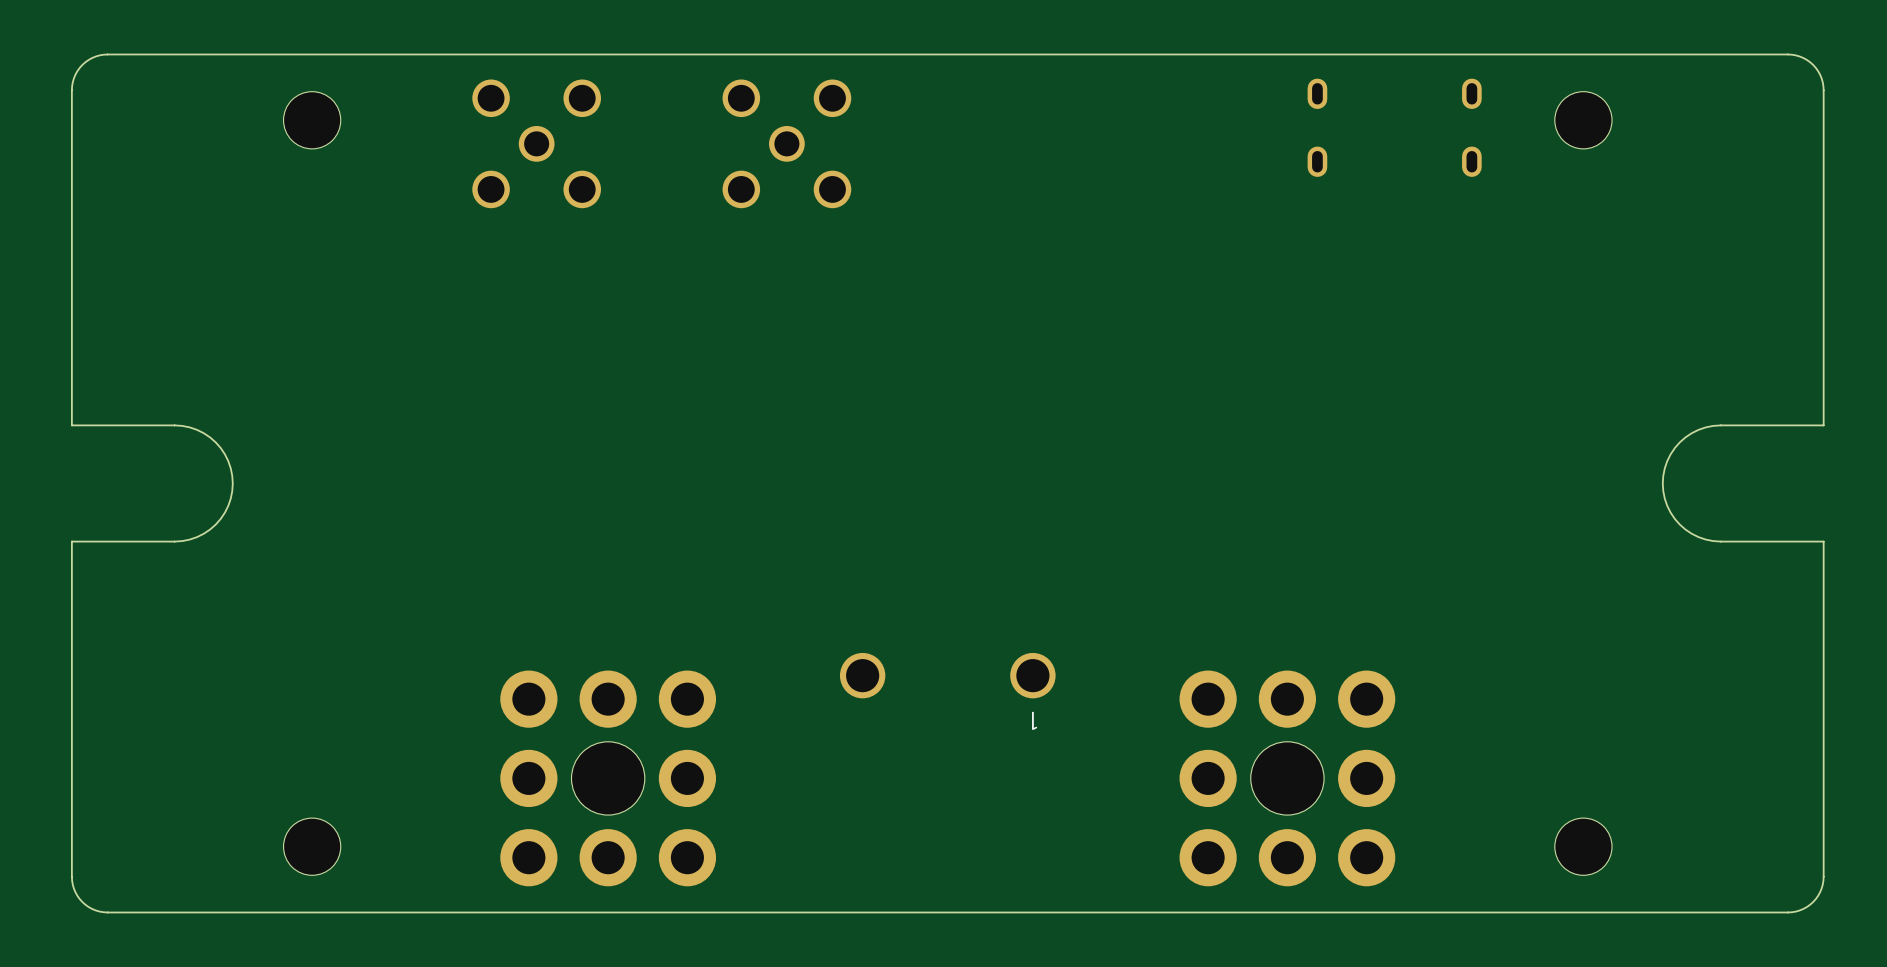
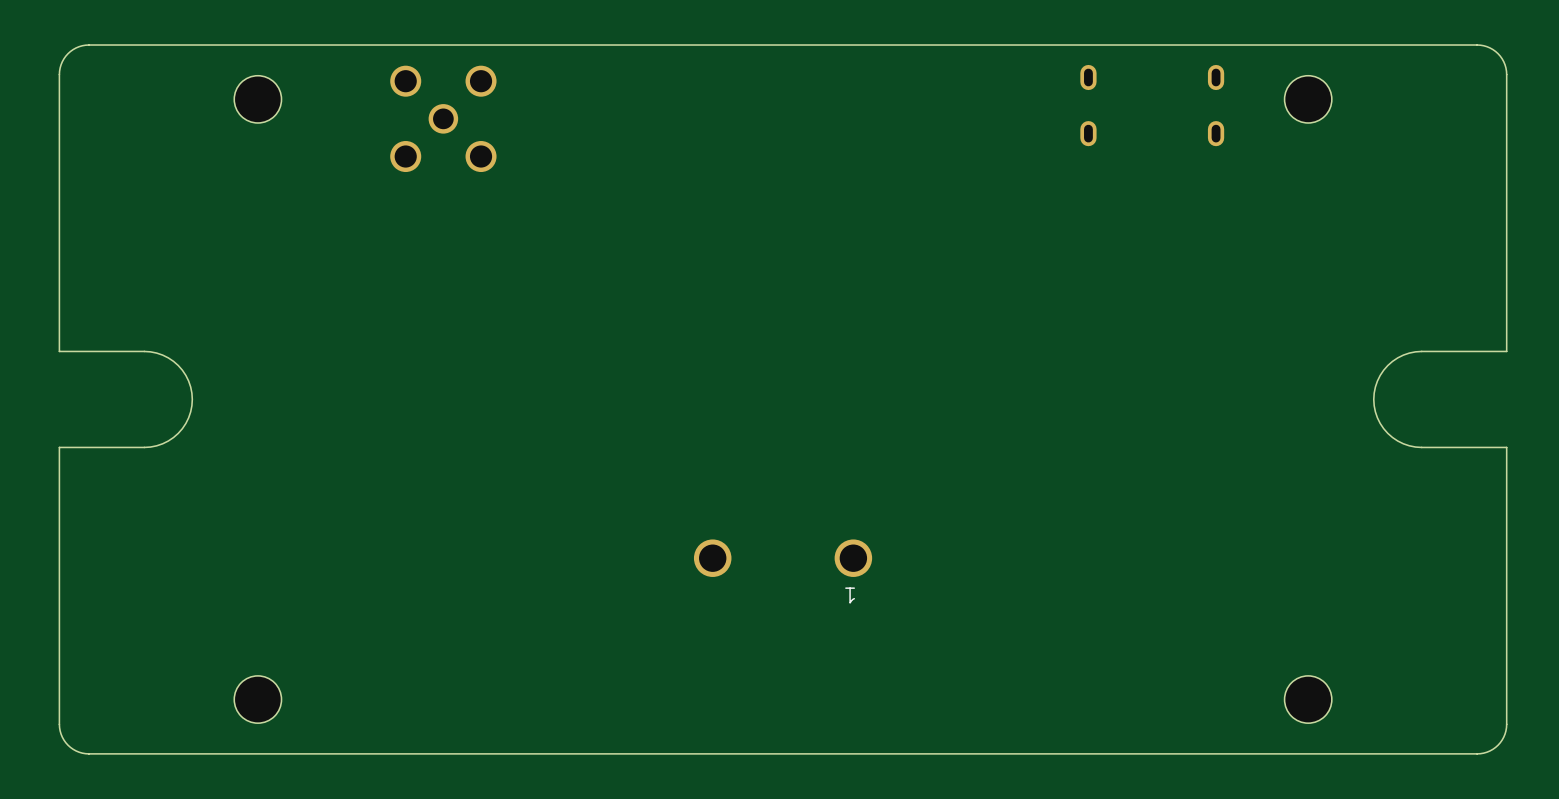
part: (786, 143) -> none
part: (608, 778) -> none
part: (1287, 778) -> none

